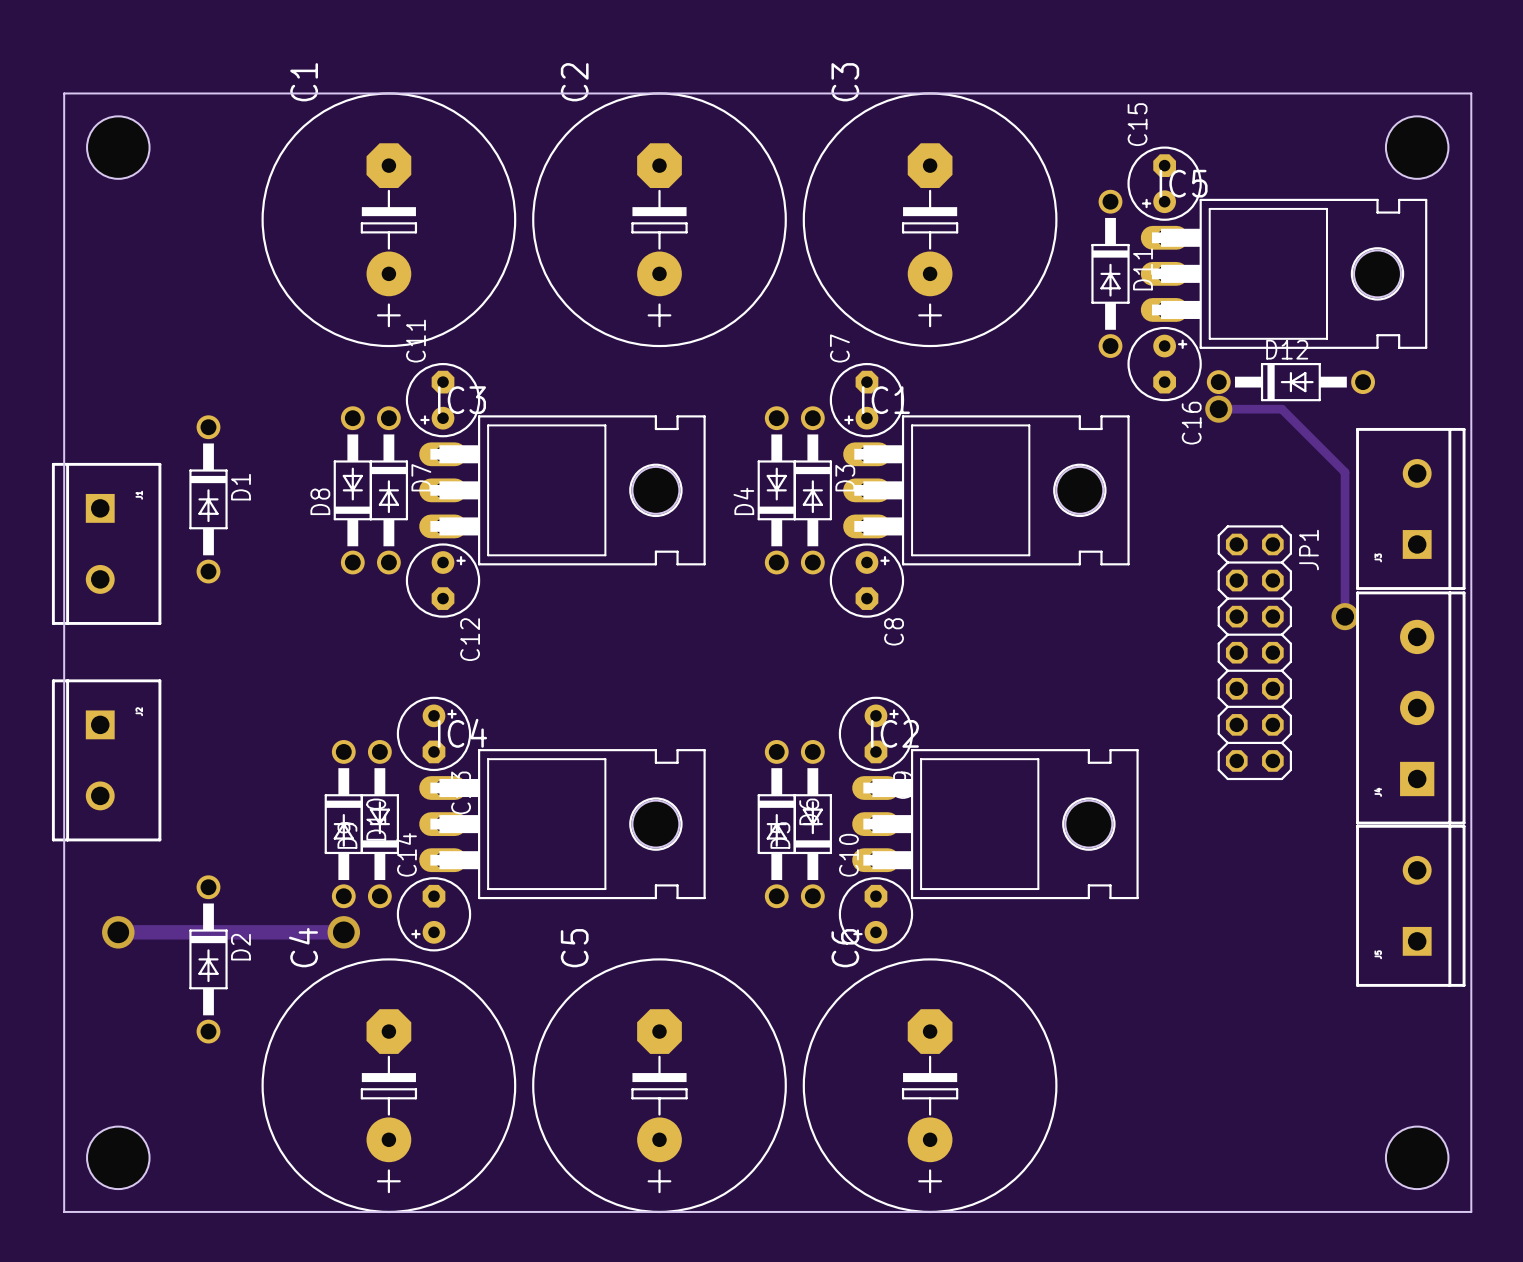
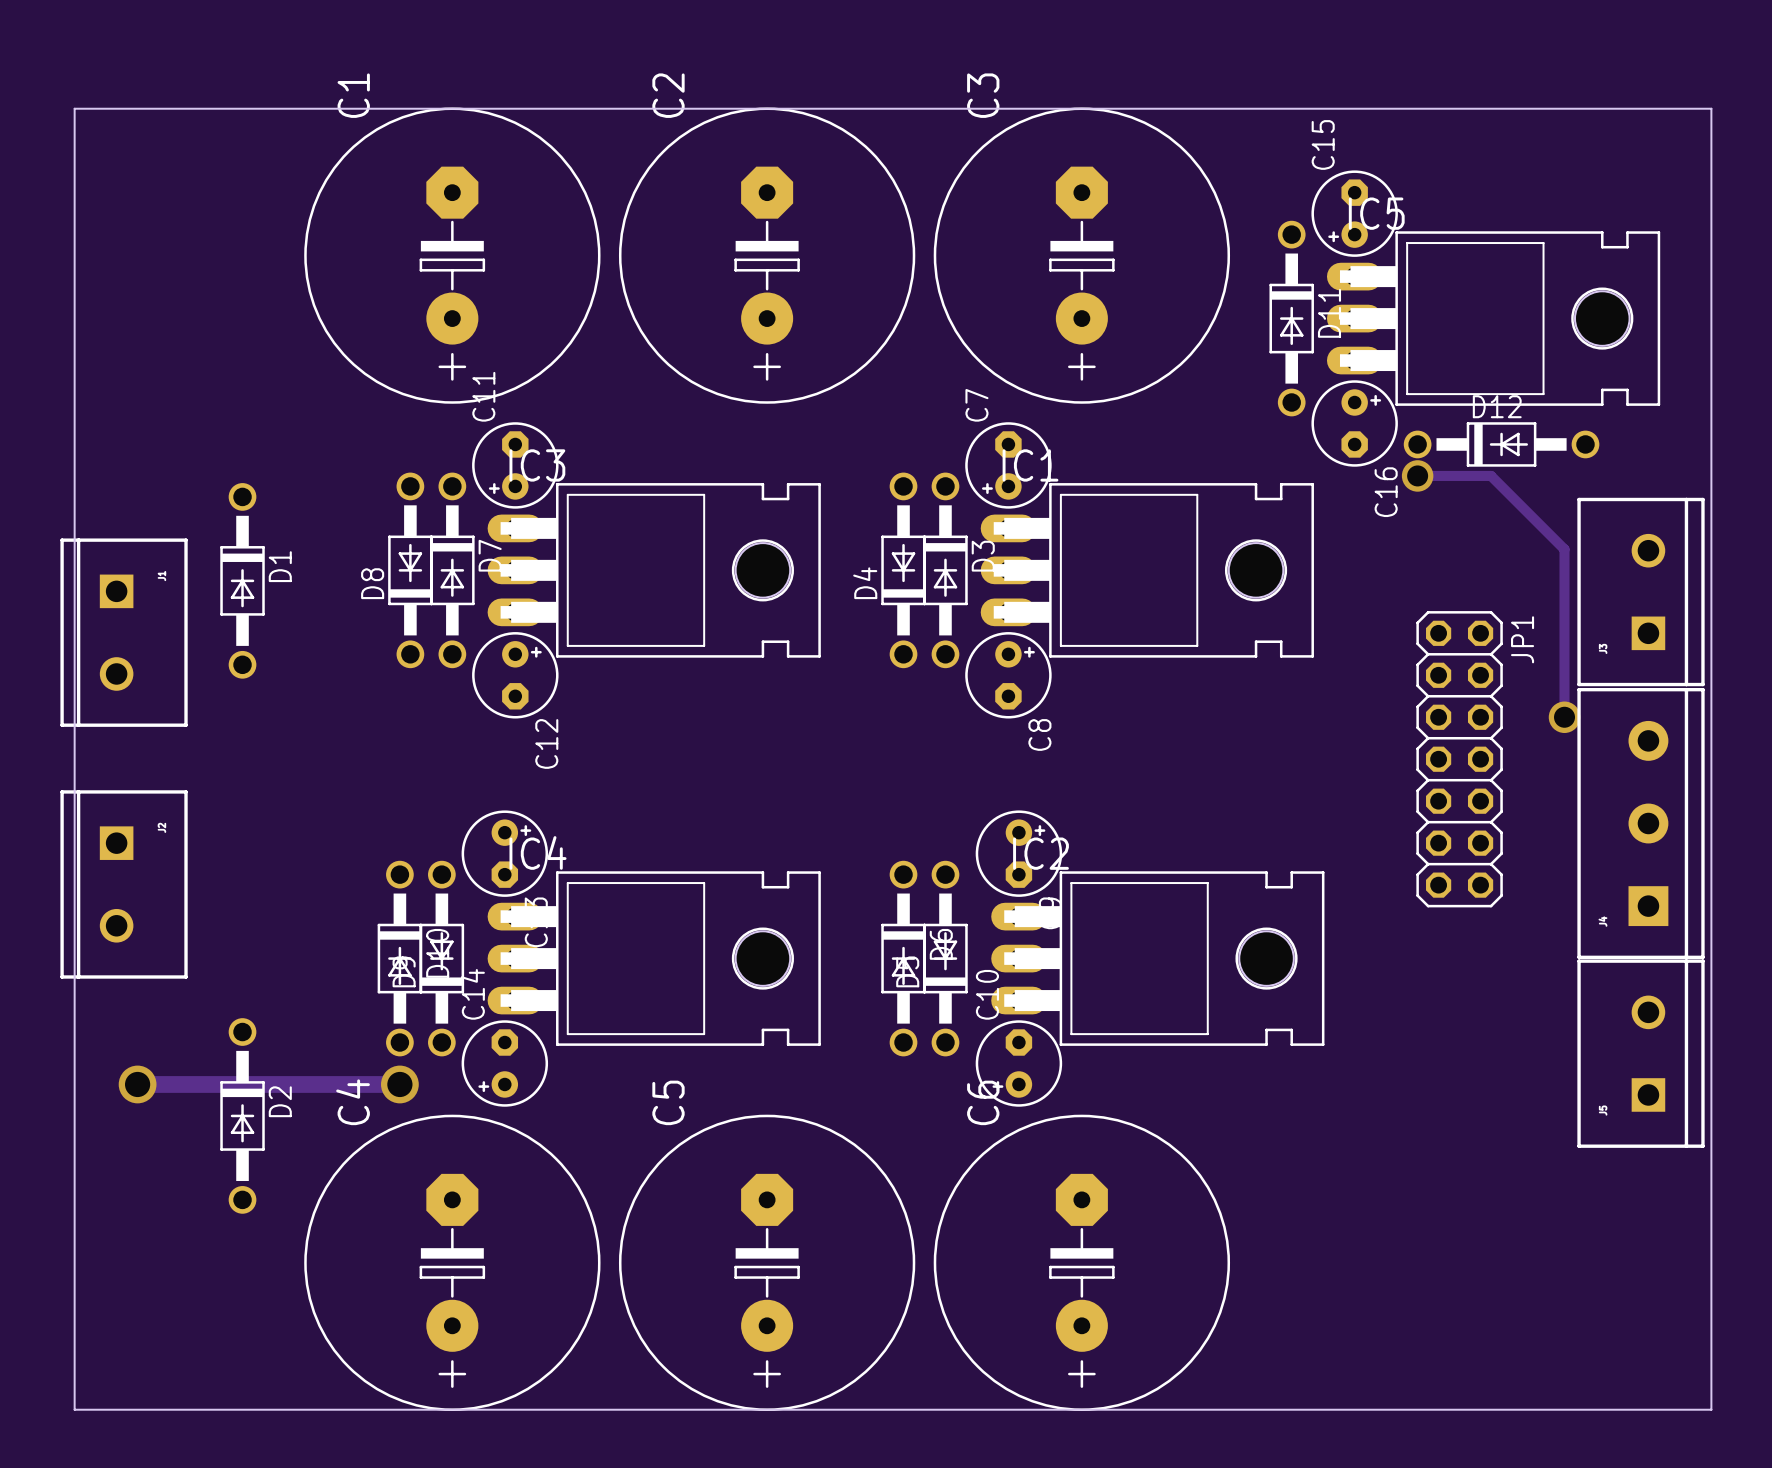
hole: (118, 147) -> none
hole: (1417, 147) -> none
hole: (118, 1157) -> none
hole: (1417, 1157) -> none

